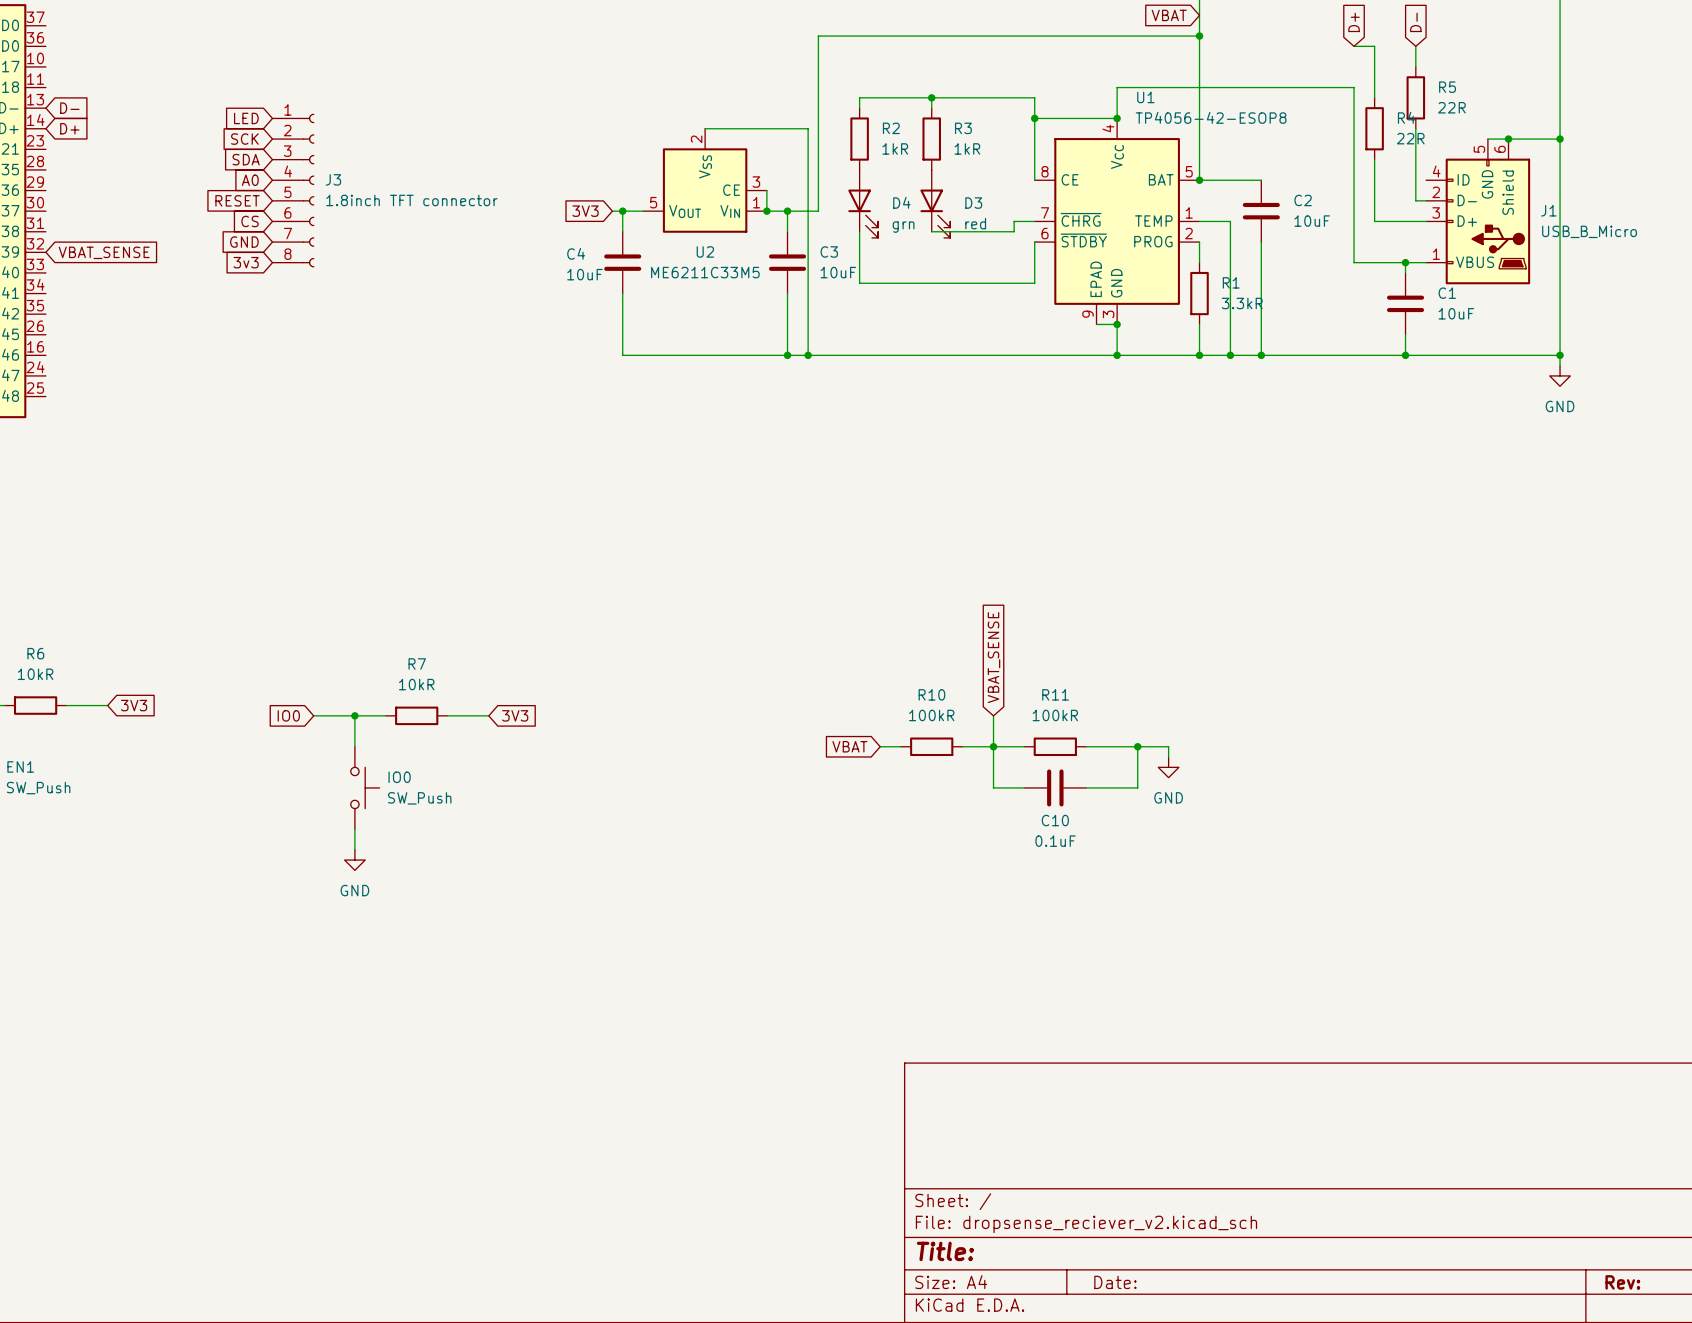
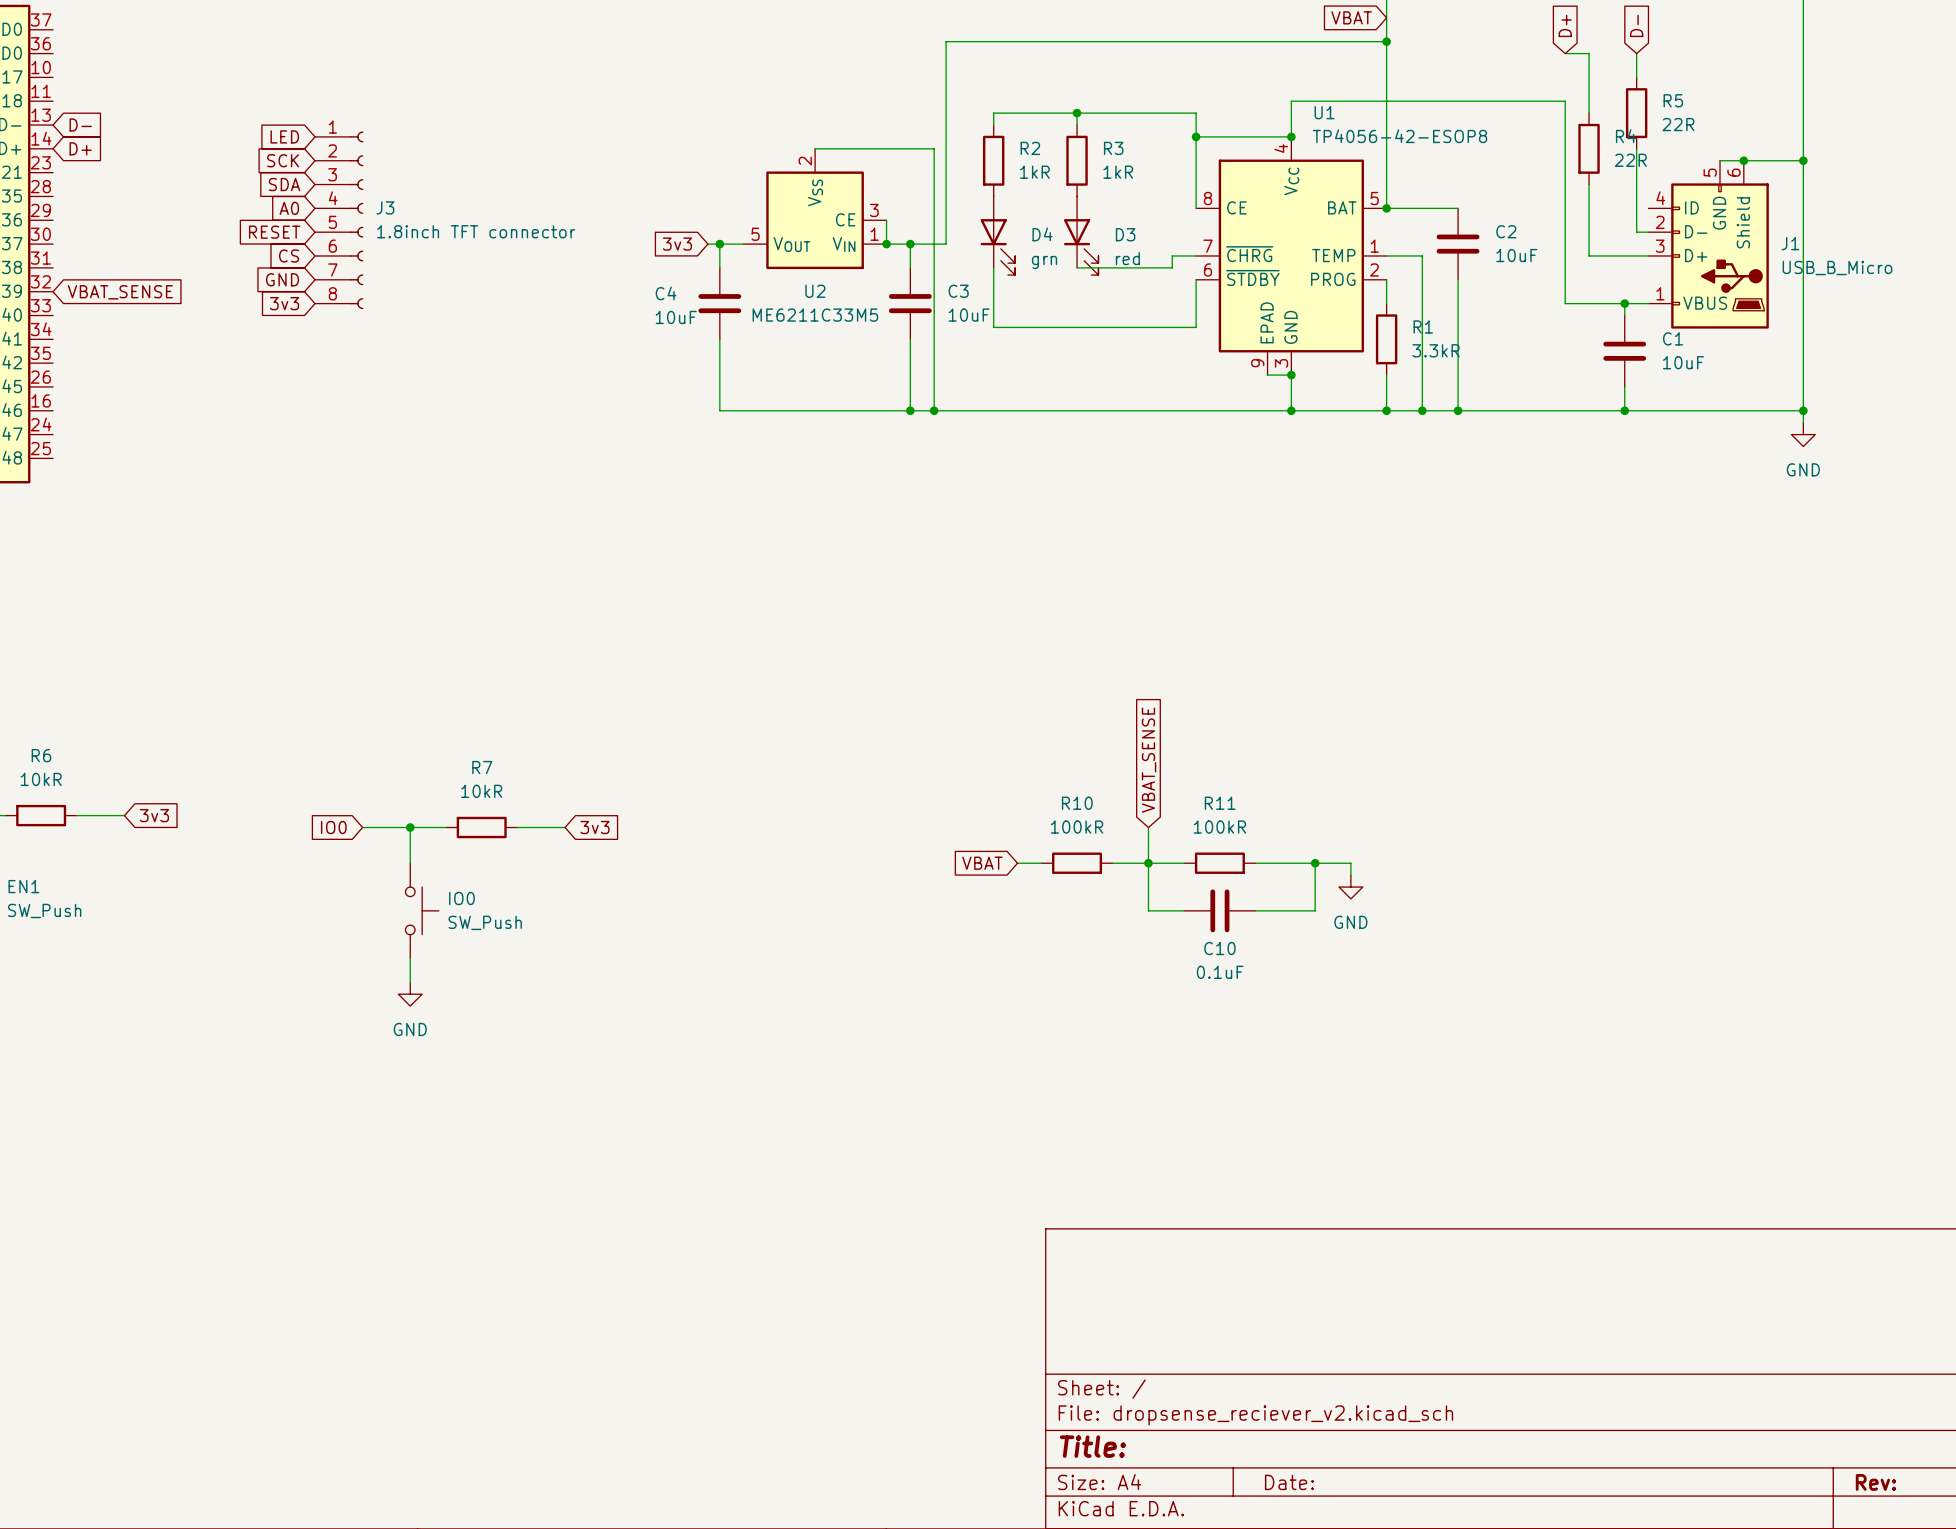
global label: 3V3 (585, 211) -> 3v3 (677, 244)
global label: 3V3 (134, 705) -> 3v3 (154, 815)
global label: 3V3 (515, 715) -> 3v3 (594, 827)

